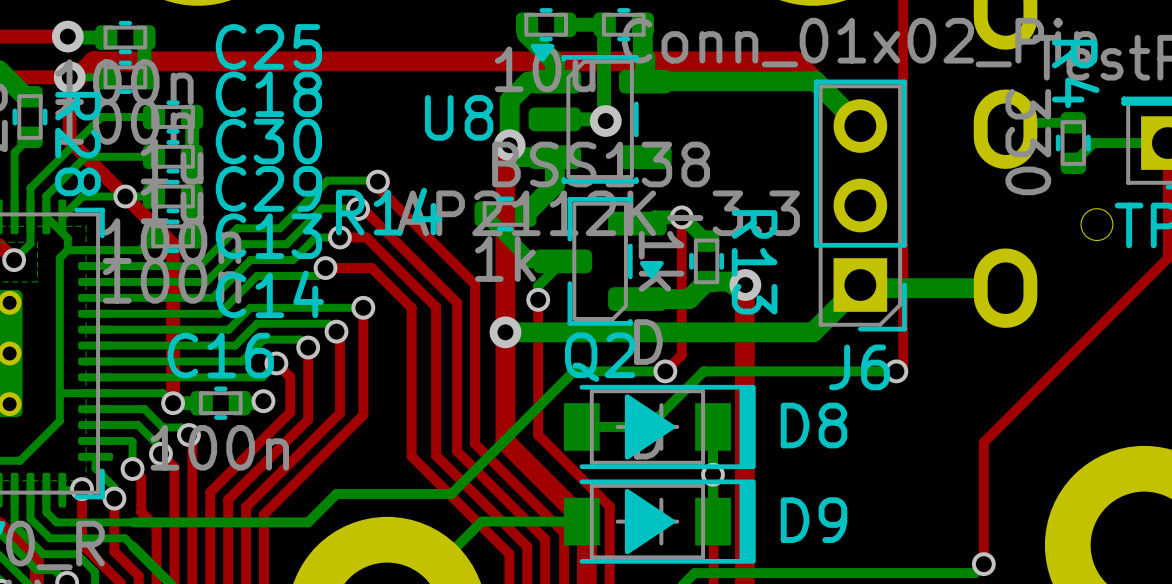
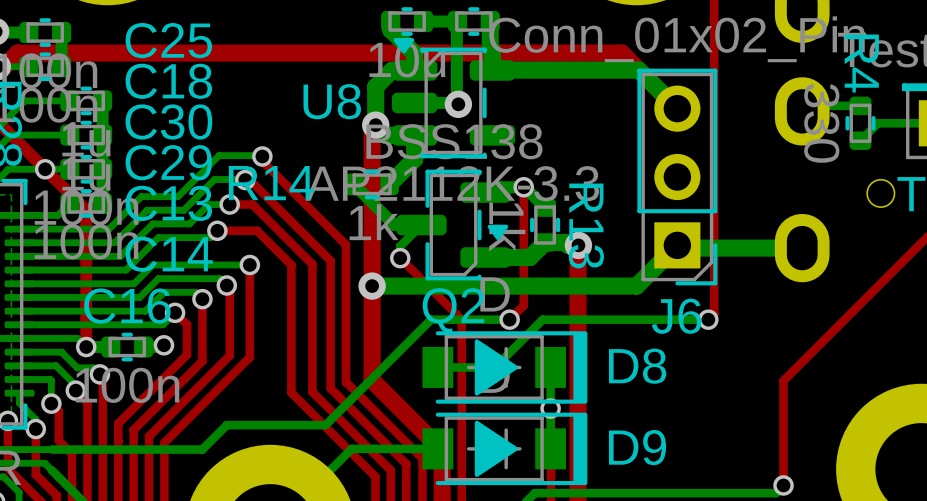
top track: (538, 299) (538, 434) (609, 506) -> (400, 258) (461, 319) (461, 435)

